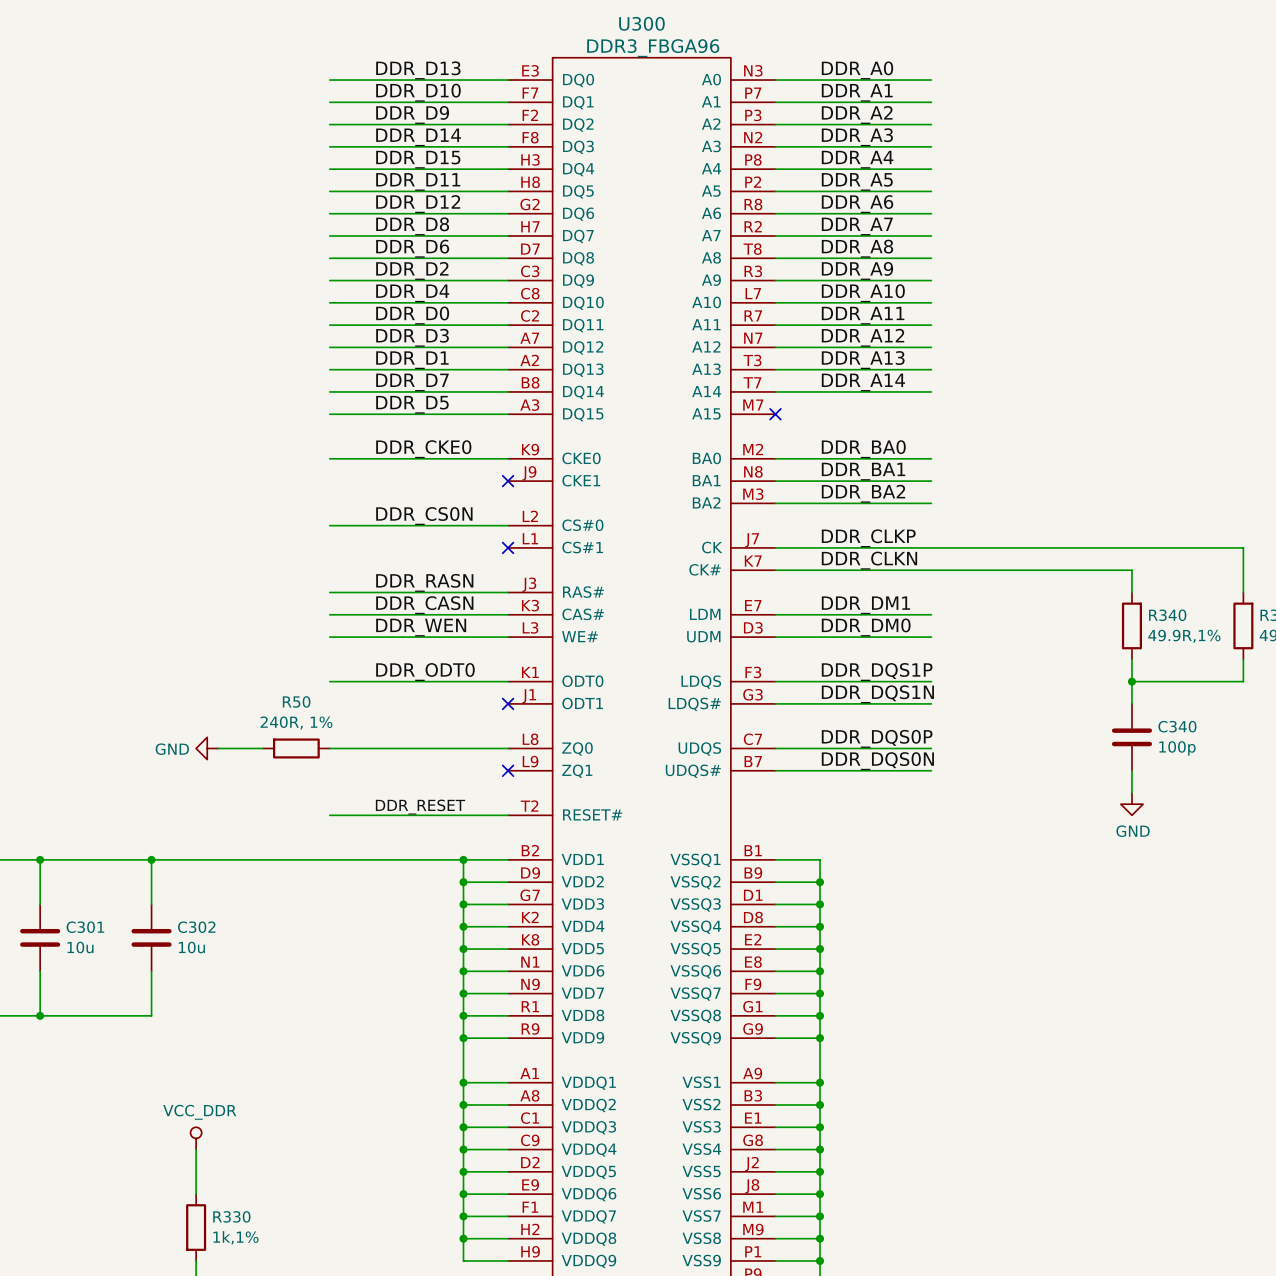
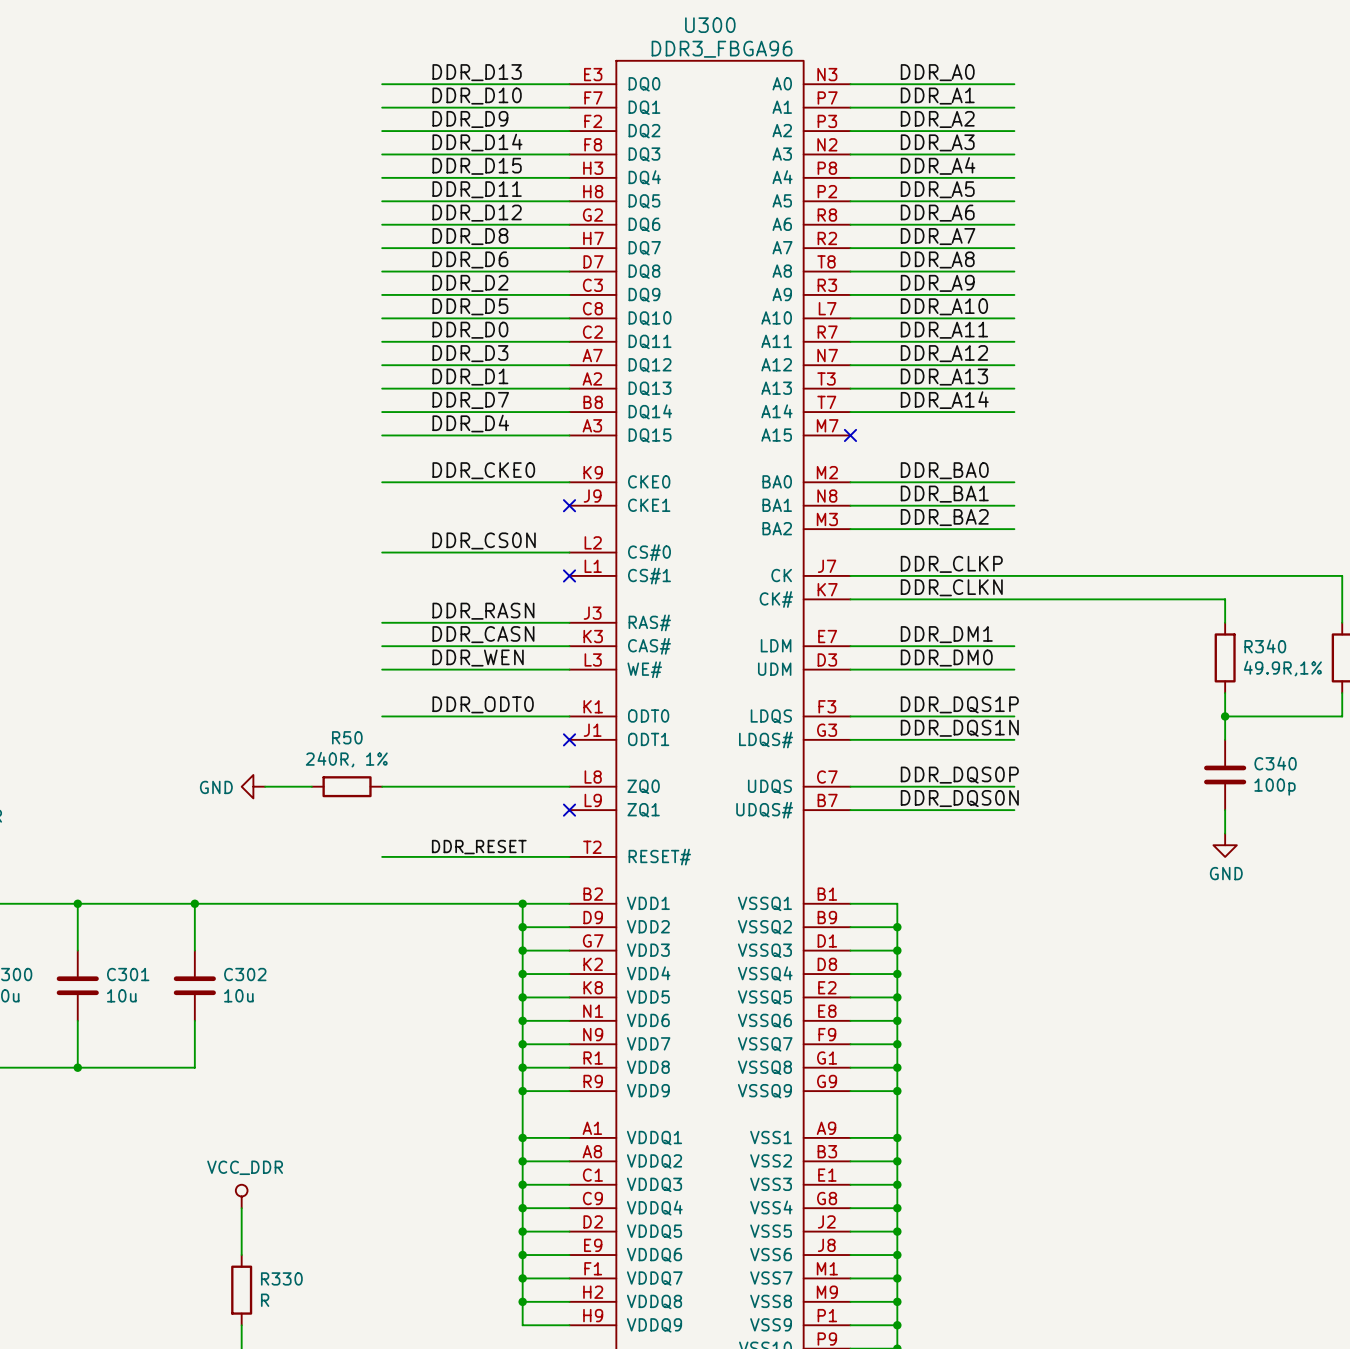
label: DDR_D4 (412, 293) -> DDR_D5 (470, 306)
label: DDR_D5 (412, 404) -> DDR_D4 (470, 423)
R330 value: 1k,1% (235, 1237) -> R (265, 1300)

